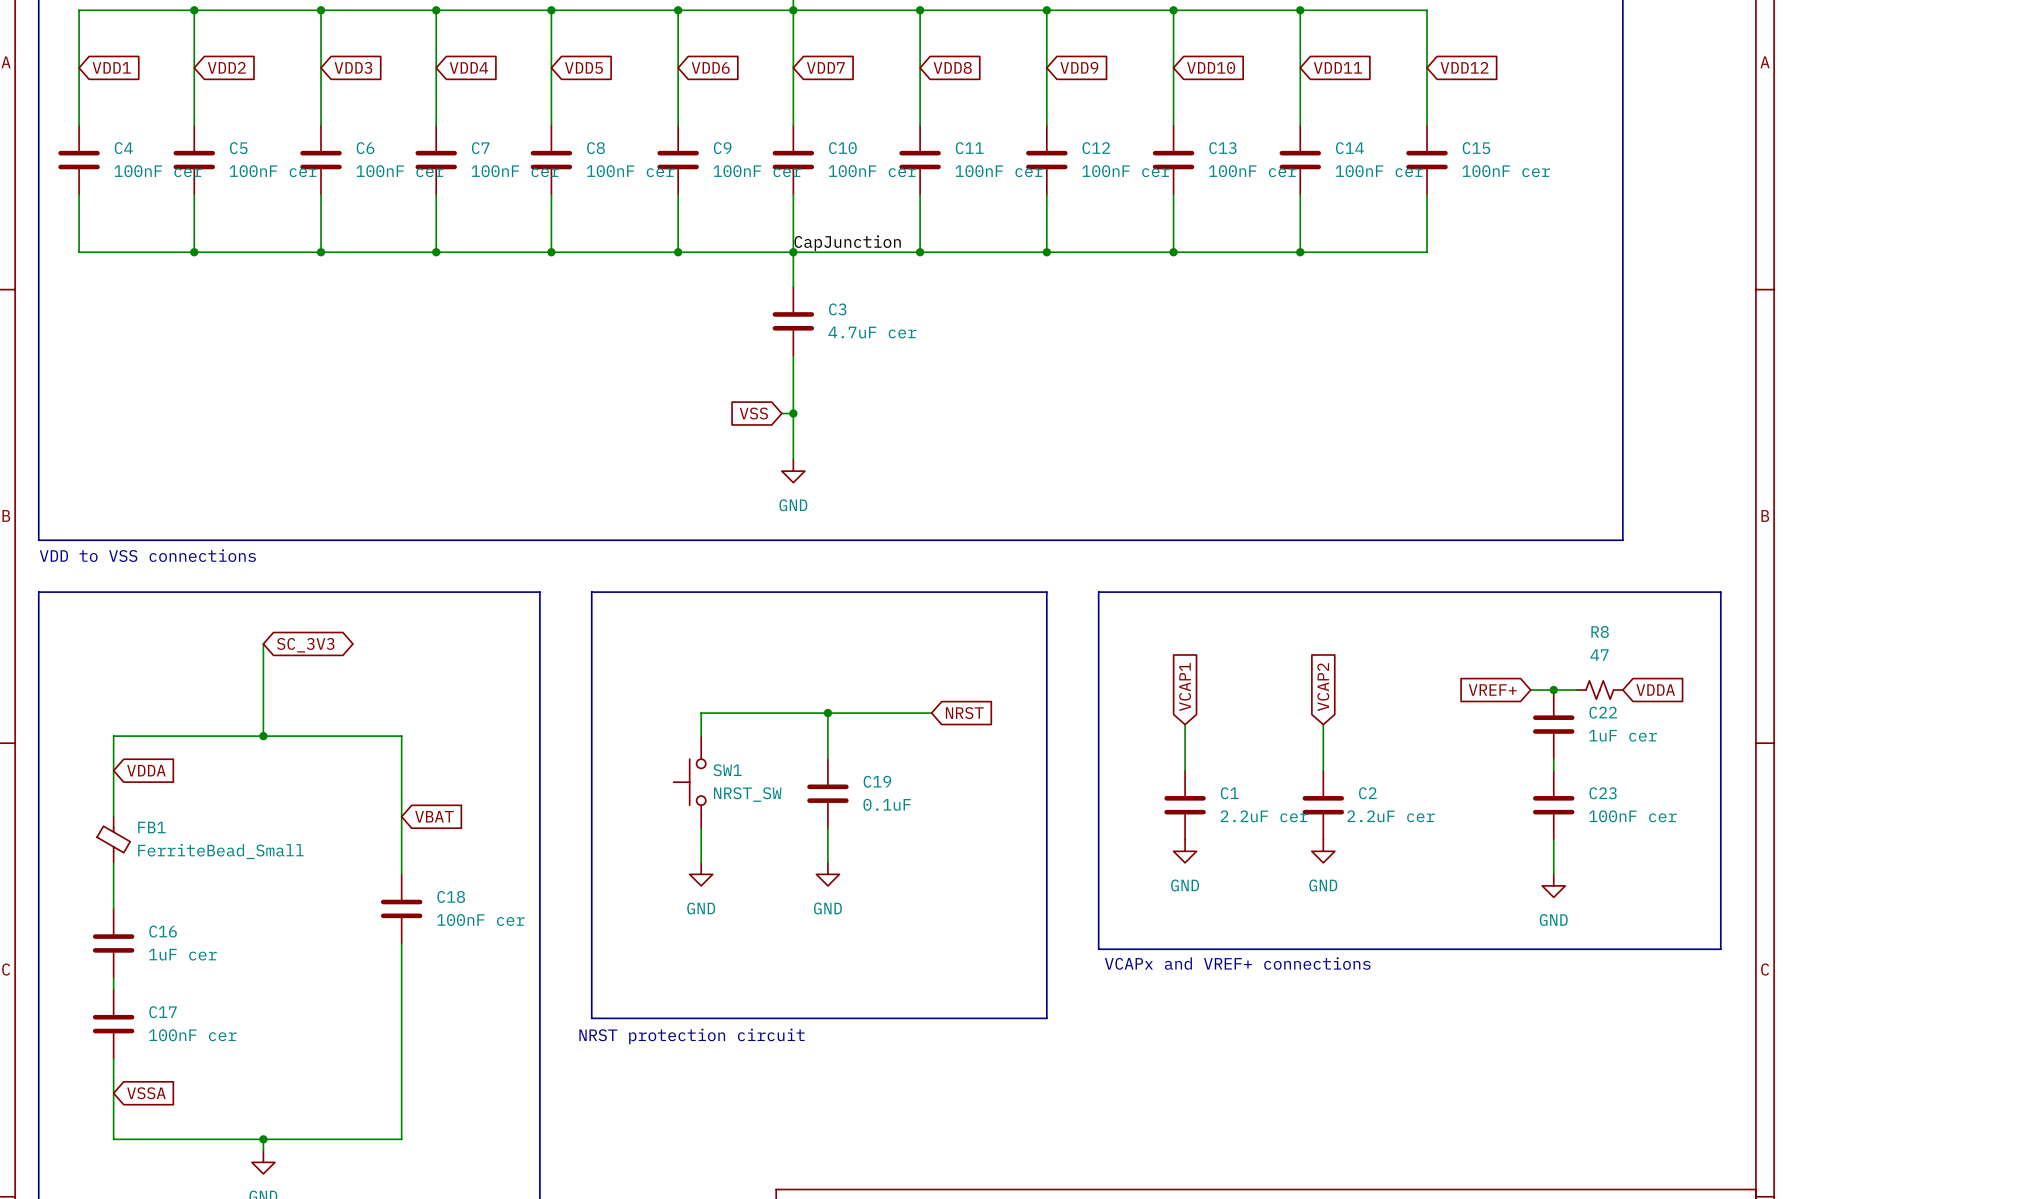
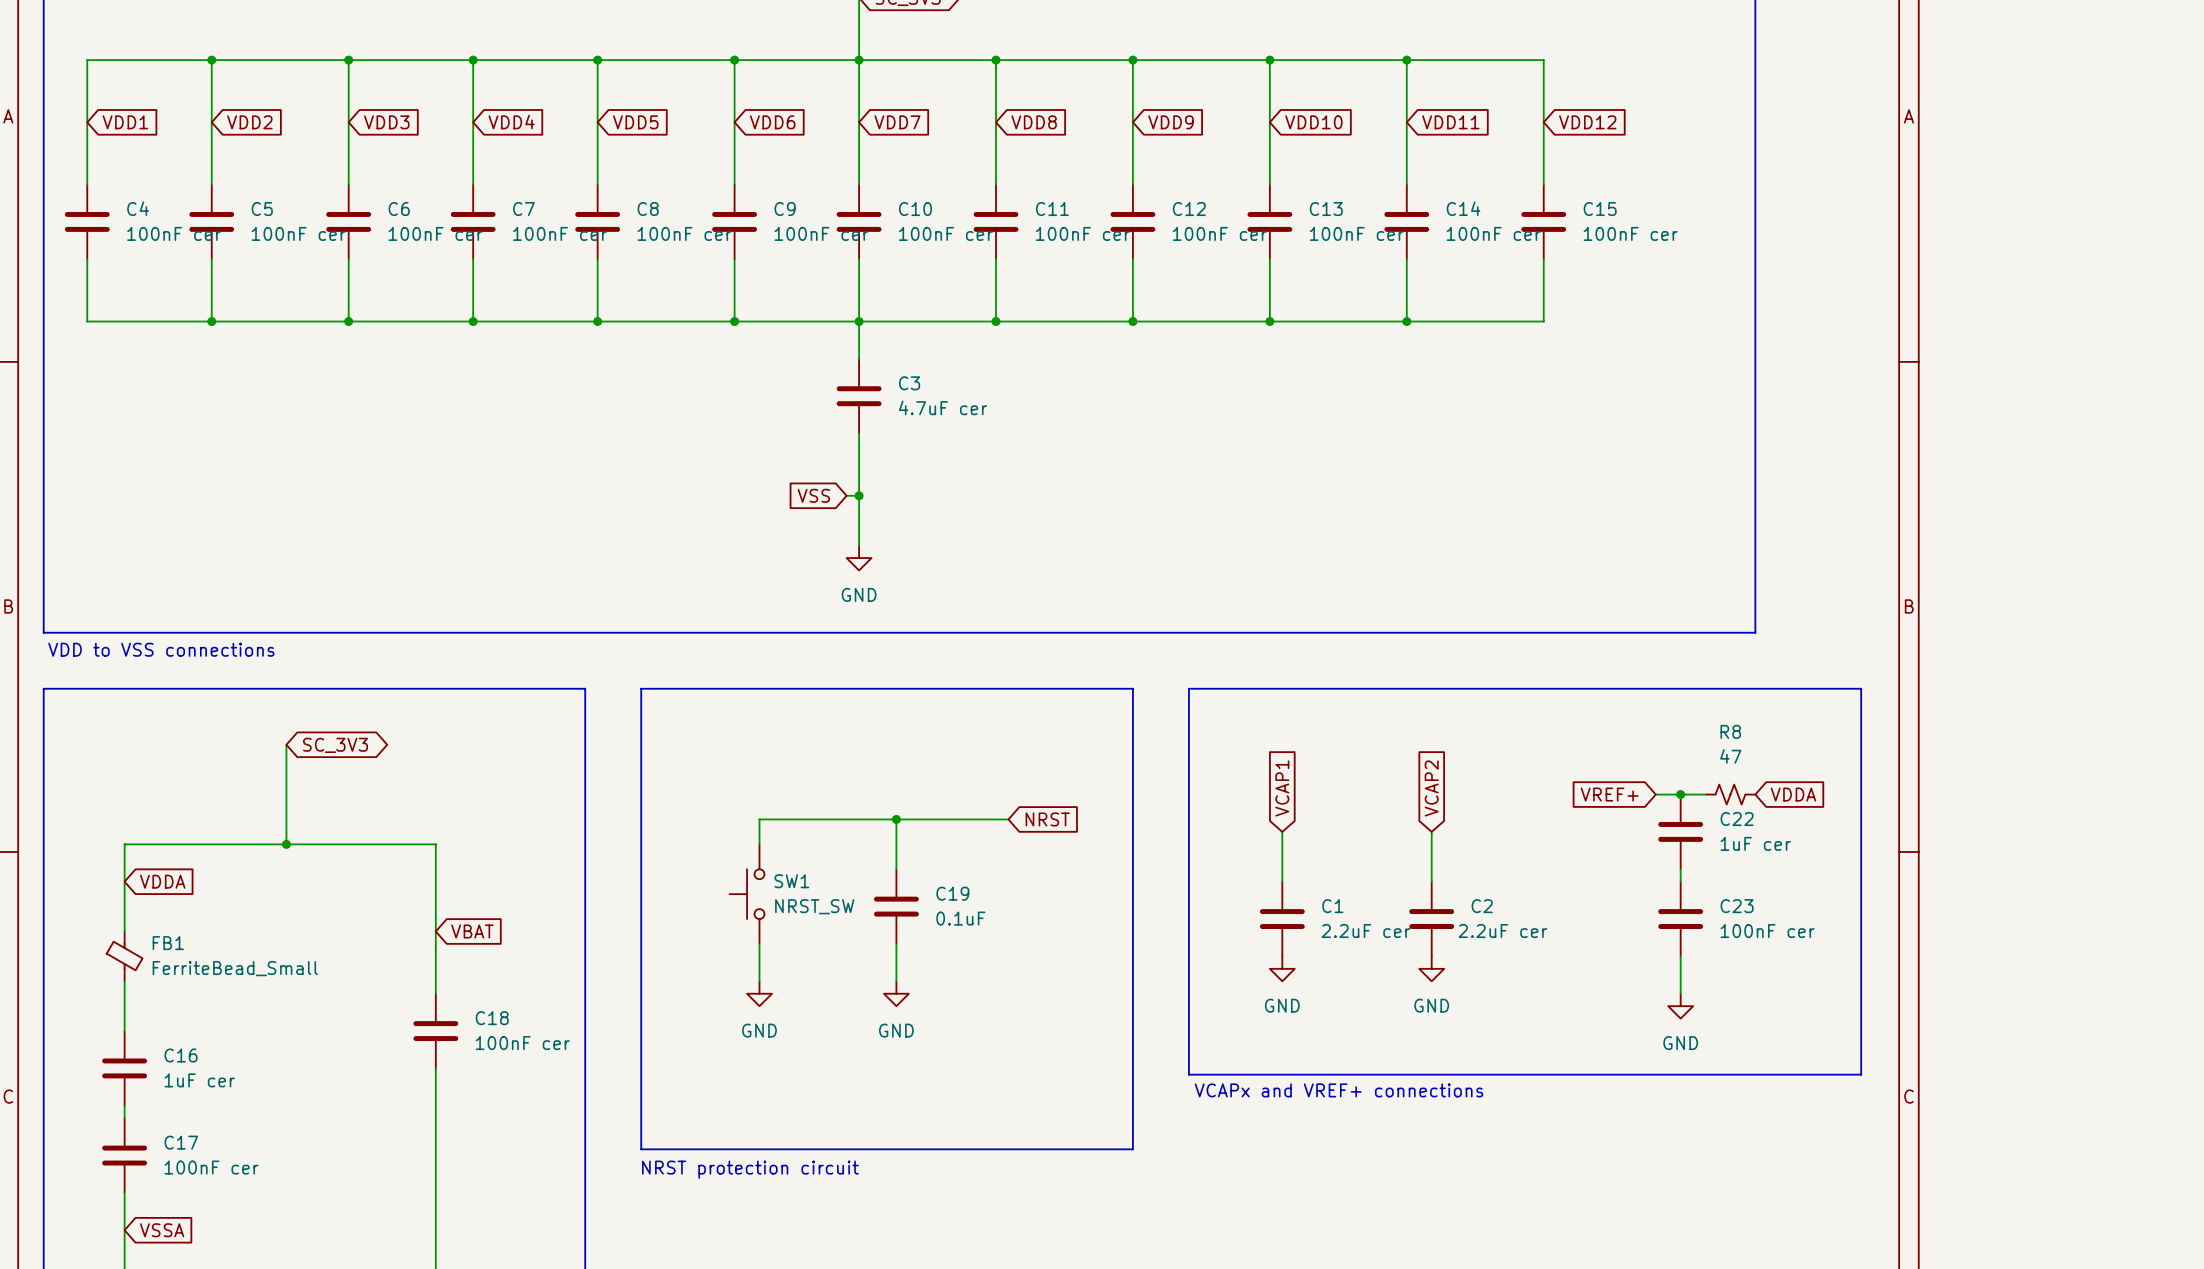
label: CapJunction (847, 243) -> none

